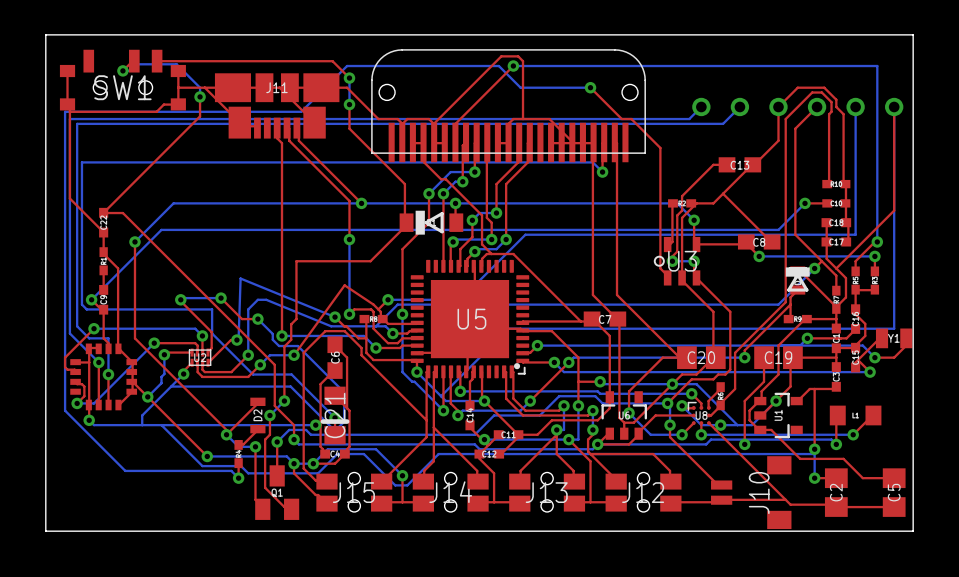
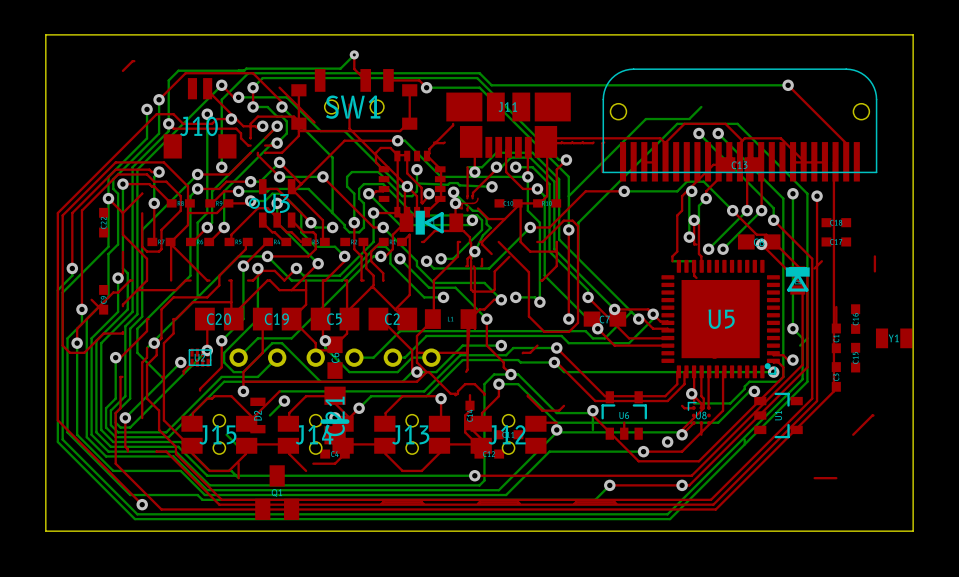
top track: none -> (354, 54) (354, 69) (365, 80)
bottom track: none -> (354, 54) (340, 68) (178, 70) (168, 80) (168, 131) (132, 167) (132, 311) (101, 343) (101, 429) (113, 442) (180, 442) (209, 470)
via: none -> (354, 54)
top track: (157, 61) (332, 61) (349, 78) -> none
top track: (513, 66) (455, 123) (455, 142) -> none
bottom track: (513, 66) (877, 66) (877, 241) -> none
via: (513, 66) -> none
bottom track: (122, 70) (129, 70) (136, 64) (176, 64) (200, 87) (200, 96) -> none
via: (122, 70) -> none
top track: (67, 71) (67, 104) (69, 104) (69, 198) (103, 232) (103, 254) (118, 268) (118, 348) (132, 362) (132, 381) -> none
top track: (178, 71) (178, 104) (163, 104) (156, 111) (69, 111) -> none
bottom track: (349, 78) (349, 104) -> none
via: (349, 78) -> none
SW1 position: (122, 80) -> (354, 99)
top track: none -> (388, 80) (419, 80) (426, 87)
top track: none -> (221, 85) (233, 97) (238, 97)
bottom track: none -> (221, 85) (137, 169) (137, 314) (125, 326) (125, 396) (110, 410) (110, 425) (118, 432) (166, 432) (221, 376) (257, 376) (277, 357)
via: none -> (221, 85)
top track: none -> (788, 85) (845, 143) (846, 161)
bottom track: none -> (788, 85) (491, 85) (479, 73) (248, 73) (221, 99) (221, 167)
via: none -> (788, 85)
top track: (178, 87) (347, 87) (378, 119) (397, 119) (402, 123) -> none
bottom track: none -> (253, 87) (262, 78) (477, 78) (559, 160) (566, 160)
via: none -> (253, 87)
bottom track: none -> (426, 87) (479, 87) (568, 176) (568, 229)
via: none -> (426, 87)
top track: (590, 87) (621, 119) (631, 119) (660, 147) (660, 268) (667, 277) -> none
bottom track: (590, 87) (520, 87) (498, 66) (347, 66) (301, 111) (65, 111) (65, 410) (125, 470) -> (77, 343) (77, 434) (113, 470) (125, 470)
via: (590, 87) -> none
top track: none -> (298, 90) (298, 121)
top track: none -> (409, 90) (409, 123) (400, 131) (298, 131)
top track: (200, 96) (200, 116) (103, 212) -> none
via: (200, 96) -> none
bottom track: none -> (238, 97) (286, 97) (320, 131) (344, 131) (400, 186) (407, 186)
via: none -> (238, 97)
top track: none -> (159, 99) (185, 73) (253, 73) (282, 102) (282, 106)
bottom track: none -> (159, 99) (159, 133) (113, 179) (113, 188) (118, 193) (118, 244) (108, 254) (108, 297) (86, 319) (86, 437) (106, 456) (173, 456) (207, 490) (498, 490) (556, 432) (679, 432)
via: none -> (159, 99)
via: (349, 104) -> none
J11 position: (277, 105) -> (508, 125)
part position: (508, 105) -> (739, 124)
bottom track: none -> (253, 106) (267, 106) (277, 116) (282, 116) (286, 121) (286, 133) (277, 143) (272, 143) (224, 191) (224, 227)
via: none -> (253, 106)
bottom track: none -> (282, 106) (332, 157) (332, 213)
via: none -> (282, 106)
part: (701, 106) -> none
bottom track: (739, 106) (723, 123) -> (72, 268) (72, 275) (57, 290) (57, 442) (134, 519) (670, 519) (807, 381) (807, 193) (737, 123) (723, 123)
part: (739, 106) -> none
part: (778, 106) -> none
top track: (817, 106) (795, 128) (795, 234) (836, 275) (836, 290) -> none
part: (817, 106) -> none
bottom track: (855, 106) (855, 234) (525, 234) (460, 299) (388, 299) -> none
part: (855, 106) -> none
top track: (894, 106) (894, 210) (836, 268) -> none
bottom track: (894, 106) (894, 328) (508, 328) (441, 396) -> none
part: (894, 106) -> none
bottom track: none -> (147, 109) (147, 138) (108, 176) (108, 246) (62, 292) (62, 439) (137, 514) (667, 514) (802, 379) (802, 338) (792, 328) (792, 193)
via: none -> (147, 109)
bottom track: none -> (207, 114) (207, 213) (197, 222) (197, 297)
via: none -> (207, 114)
top track: none -> (231, 119) (216, 119) (212, 123) (183, 123) (173, 114) (156, 114) (57, 213) (57, 420) (142, 504)
via: none -> (231, 119)
top track: (523, 119) (523, 61) (518, 56) (501, 56) (433, 123) -> none
bottom track: (645, 119) (69, 119) (69, 333) (98, 362) -> (645, 119) (568, 196)
top track: none -> (298, 121) (294, 116) (257, 116) (250, 123) (250, 137)
top track: none -> (168, 123) (173, 128) (236, 128) (241, 133) (241, 138) (250, 145)
via: none -> (168, 123)
top track: (402, 123) (407, 119) (429, 119) (433, 123) -> none
top track: none -> (453, 123) (429, 148) (429, 153) (426, 156) (441, 169) (441, 198) (426, 212)
bottom track: (677, 123) (77, 123) (77, 326) (89, 338) (108, 338) (108, 374) -> (677, 123) (578, 222) (578, 258)
via: none -> (262, 126)
top track: none -> (277, 126) (265, 138)
bottom track: none -> (277, 126) (212, 191) (212, 222) (207, 227)
via: none -> (277, 126)
top track: (277, 128) (277, 138) (282, 143) (282, 335) -> none
top track: (287, 128) (289, 128) (289, 140) (349, 200) (349, 239) -> none
bottom track: none -> (698, 133) (773, 208) (773, 220)
via: none -> (698, 133)
bottom track: none -> (718, 133) (783, 198) (783, 376) (778, 381) (749, 381) (730, 403) (694, 403)
via: none -> (718, 133)
top track: (298, 135) (298, 140) (361, 203) -> (298, 135) (282, 152) (265, 153)
top track: none -> (397, 140) (344, 140) (294, 191) (291, 186) (291, 188) (322, 220) (322, 241) (324, 241)
bottom track: none -> (397, 140) (404, 140) (441, 176) (527, 176) (527, 210) (539, 222) (539, 302) (535, 297) (515, 297)
via: none -> (397, 140)
top track: none -> (742, 140) (725, 123) (684, 123) (665, 143)
top track: (412, 142) (424, 143) (424, 162) (441, 179) (445, 179) (482, 215) (482, 241) -> none
top track: (466, 142) (462, 145) (462, 181) -> none
top track: (487, 142) (486, 217) (491, 222) (491, 239) -> none
top track: (497, 142) (508, 143) (508, 123) (513, 119) (549, 119) (572, 142) -> (729, 161) (739, 162) (739, 143) (744, 138) (780, 138) (803, 161)
top track: (519, 142) (518, 162) (496, 184) (496, 213) -> none
top track: (614, 142) (617, 143) (617, 294) (679, 357) -> none
top track: none -> (277, 143) (274, 145) (265, 145)
via: none -> (277, 143)
top track: (592, 143) (592, 294) (617, 319) (619, 319) (619, 417) (624, 422) (633, 422) (682, 374) (696, 374) (713, 357) (713, 311) (682, 280) (682, 217) (696, 203) -> none
top track: none -> (665, 143) (660, 138) (542, 138) (547, 143) (547, 196) (539, 203) (517, 203)
top track: none -> (508, 147) (506, 150) (506, 172) (523, 188) (537, 188)
top track: none -> (250, 152) (228, 174) (197, 174)
top track: none -> (257, 152) (257, 155) (279, 176)
top track: none -> (397, 155) (407, 156) (407, 173) (421, 187) (421, 202) (426, 198)
top track: none -> (397, 155) (397, 212) (373, 213)
top track: none -> (397, 155) (390, 147) (380, 147) (376, 152) (376, 162) (384, 169)
top track: none -> (566, 160) (556, 169) (556, 203)
via: none -> (566, 160)
top track: none -> (644, 161) (654, 161)
top track: none -> (718, 161) (718, 179) (706, 191) (706, 198)
top track: none -> (750, 161) (747, 164) (747, 210)
top track: none -> (761, 161) (761, 210)
top track: none -> (803, 161) (824, 161)
top track: none -> (803, 161) (792, 162)
top track: none -> (835, 161) (833, 162) (833, 391) (715, 509) (161, 509) (115, 463) (115, 413) (120, 408) (120, 376) (122, 376)
top track: none -> (279, 162) (301, 184)
bottom track: none -> (279, 162) (260, 181) (250, 181)
via: none -> (279, 162)
top track: (527, 162) (506, 184) (506, 239) -> (527, 162) (527, 176)
via: none -> (221, 167)
top track: none -> (467, 167) (467, 198)
bottom track: none -> (467, 167) (482, 167) (496, 152) (532, 152) (559, 179) (559, 239) (638, 319)
top track: none -> (496, 167) (472, 192) (472, 198)
bottom track: none -> (496, 167) (501, 167) (510, 157) (530, 157) (554, 181) (554, 249) (614, 309)
via: none -> (496, 167)
bottom track: none -> (515, 167) (532, 167) (549, 184) (549, 251) (588, 290) (588, 297)
via: none -> (515, 167)
bottom track: none -> (416, 169) (416, 191) (412, 196) (402, 196) (378, 172) (351, 172) (347, 176) (347, 186) (354, 193) (354, 222)
via: none -> (416, 169)
top track: none -> (159, 172) (151, 172) (149, 169) (115, 169) (72, 213) (72, 268)
bottom track: none -> (159, 172) (154, 176) (154, 203)
via: none -> (159, 172)
bottom track: (474, 172) (450, 172) (429, 193) -> none
bottom track: (602, 172) (592, 162) (81, 162) (81, 304) (86, 309) (212, 309) (212, 333) (253, 374) (291, 374) (335, 417) -> none
via: (602, 172) -> none
via: none -> (197, 174)
bottom track: none -> (279, 176) (322, 176)
via: none -> (279, 176)
top track: none -> (322, 176) (373, 227) (383, 227)
via: none -> (322, 176)
via: none -> (527, 176)
top track: none -> (250, 181) (226, 181) (219, 188) (197, 188)
via: none -> (250, 181)
bottom track: (462, 181) (455, 181) (443, 193) -> none
via: (462, 181) -> none
bottom track: none -> (416, 183) (448, 184) (457, 183) (459, 185) (492, 186)
top track: none -> (122, 184) (149, 184) (171, 203)
bottom track: none -> (122, 184) (122, 268) (127, 273) (127, 309) (96, 340) (96, 432) (110, 446) (178, 446) (207, 475) (474, 475)
via: none -> (122, 184)
top track: (827, 184) (829, 184) (829, 114) (831, 111) (831, 102) (821, 92) (812, 92) (785, 119) (785, 302) (735, 352) (735, 388) (720, 403) (720, 405) (711, 415) (708, 415) -> none
part position: (836, 184) -> (547, 203)
top track: none -> (262, 186) (265, 188) (277, 188) (310, 222)
top track: none -> (407, 186) (416, 196) (417, 212)
via: none -> (407, 186)
via: none -> (492, 186)
bottom track: none -> (197, 188) (190, 196) (190, 275) (137, 328) (137, 352) (163, 379)
via: none -> (197, 188)
bottom track: none -> (537, 188) (544, 196) (544, 275) (597, 328)
via: none -> (537, 188)
top track: none -> (384, 189) (383, 191) (368, 193)
top track: none -> (238, 191) (224, 191) (210, 203)
bottom track: none -> (238, 191) (308, 188) (349, 232) (359, 232) (363, 227) (363, 203) (359, 198) (359, 188) (363, 184) (383, 184) (414, 215) (477, 215) (482, 220) (482, 229) (453, 258) (441, 258)
via: none -> (238, 191)
top track: none -> (624, 191) (585, 191) (549, 227) (530, 227)
bottom track: none -> (624, 191) (677, 191) (686, 181) (703, 181) (732, 210)
via: none -> (624, 191)
bottom track: none -> (691, 191) (689, 193) (689, 237)
via: none -> (691, 191)
bottom track: none -> (453, 192) (472, 210) (479, 210) (486, 218) (486, 224) (490, 227) (482, 235) (471, 259)
via: none -> (453, 192)
top track: none -> (142, 193) (122, 213)
bottom track: none -> (368, 193) (400, 225) (472, 225)
top track: (429, 193) (429, 222) (402, 249) (402, 314) -> none
top track: (443, 193) (443, 266) -> none
via: (443, 193) -> none
top track: (723, 193) (772, 241) -> none
via: none -> (792, 193)
top track: none -> (817, 196) (817, 401) (713, 504) (219, 504) (166, 451) (156, 451)
via: none -> (817, 196)
top track: none -> (108, 198) (122, 213)
via: none -> (108, 198)
top track: none -> (477, 198) (474, 203) (462, 203) (462, 208) (452, 206)
bottom track: none -> (706, 198) (698, 205) (698, 225)
via: none -> (706, 198)
top track: none -> (250, 200) (248, 203) (226, 203) (216, 213) (188, 213)
bottom track: none -> (250, 200) (265, 200) (272, 193) (282, 193) (301, 213) (301, 232) (315, 246) (335, 246) (344, 256)
via: none -> (250, 200)
top track: none -> (154, 203) (154, 241) (152, 241)
via: none -> (154, 203)
bottom track: none -> (277, 203) (277, 222) (318, 263)
via: none -> (277, 203)
via position: (361, 203) -> (368, 193)
top track: (672, 203) (672, 241) (667, 244) -> none
part position: (682, 203) -> (354, 241)
top track: (691, 203) (713, 203) (778, 140) (778, 106) (797, 87) (824, 87) (836, 99) (836, 106) (843, 114) (843, 184) (845, 184) (845, 222) (848, 222) (848, 241) (846, 241) -> none
top track: (805, 203) (827, 203) -> none
bottom track: (805, 203) (778, 229) (161, 229) (91, 299) -> none
via: (805, 203) -> none
part position: (836, 203) -> (508, 203)
top track: none -> (468, 206) (467, 210)
top track: none -> (477, 208) (488, 219) (504, 219)
top track: none -> (732, 210) (756, 234) (766, 234) (807, 275) (807, 367) (689, 485) (609, 485)
via: none -> (732, 210)
bottom track: none -> (747, 210) (708, 249)
via: none -> (747, 210)
bottom track: none -> (761, 210) (723, 249)
via: none -> (761, 210)
top track: (103, 213) (122, 213) (274, 364) (274, 405) (294, 425) (294, 439) -> none
top track: none -> (122, 213) (122, 234) (147, 258) (147, 280) (122, 306)
top track: none -> (142, 213) (142, 246) (147, 251) (159, 251) (161, 249) (161, 229) (180, 210) (180, 196) (166, 181) (154, 181) (147, 174) (118, 174) (81, 210) (81, 309)
bottom track: none -> (373, 213) (373, 241) (339, 275) (303, 275) (296, 268)
via: none -> (373, 213)
bottom track: (496, 213) (479, 213) (472, 220) -> none
via: (496, 213) -> none
top track: none -> (262, 220) (265, 220) (265, 225) (272, 232) (286, 241)
top track: none -> (291, 220) (303, 232) (313, 232) (315, 234) (315, 249) (308, 256) (267, 256)
bottom track: (694, 220) (677, 203) (173, 203) (134, 241) -> none
top track: none -> (773, 220) (812, 258) (812, 398) (711, 499) (221, 499) (175, 454) (175, 446) (159, 429) (159, 410) (147, 398) (147, 364) (156, 355) (156, 343) (161, 338) (161, 309) (173, 297) (207, 297) (219, 285) (219, 275) (245, 249) (245, 241) (247, 241)
via: none -> (773, 220)
bottom track: none -> (310, 222) (315, 227) (332, 227)
via: none -> (310, 222)
top track: none -> (354, 222) (354, 249) (361, 256) (361, 280) (363, 280)
via: none -> (354, 222)
top track: none -> (404, 222) (392, 234) (392, 249) (385, 256) (380, 256)
top track: (826, 222) (826, 258) (845, 278) (845, 297) (836, 307) (802, 273) (797, 273) (797, 271) -> none
top track: (472, 225) (472, 237) (460, 249) (460, 266) (458, 266) -> none
top track: none -> (698, 225) (698, 254) (701, 256) (701, 266)
top track: (404, 226) (370, 261) (296, 261) (296, 319) (291, 324) (291, 339) (284, 346) (284, 401) -> none
top track: none -> (207, 227) (190, 241)
via: none -> (207, 227)
top track: none -> (224, 227) (209, 241)
via: none -> (224, 227)
via: none -> (332, 227)
bottom track: none -> (383, 227) (416, 261) (416, 266) (433, 282) (484, 282) (501, 299)
via: none -> (383, 227)
bottom track: none -> (530, 227) (489, 268) (433, 268) (426, 261)
via: none -> (530, 227)
top track: none -> (568, 229) (568, 319)
via: none -> (568, 229)
via: none -> (689, 237)
bottom track: (349, 239) (349, 314) -> none
via: (349, 239) -> none
bottom track: (491, 239) (455, 239) (453, 241) -> none
via: (491, 239) -> none
bottom track: (506, 239) (496, 249) (477, 249) (474, 251) -> none
via: (506, 239) -> none
top track: (134, 241) (134, 338) (228, 432) -> none
via: (134, 241) -> none
top track: none -> (171, 241) (171, 244) (209, 280)
top track: none -> (171, 241) (188, 225) (188, 186) (163, 162) (115, 162) (62, 215) (62, 345) (69, 352) (84, 352) (103, 333) (122, 333) (122, 331)
top track: none -> (229, 241) (231, 241) (231, 234) (257, 208) (267, 208) (277, 217) (277, 222) (286, 232) (291, 232) (301, 241) (306, 241)
top track: none -> (268, 241) (243, 266)
top track: none -> (363, 241) (363, 251) (366, 254) (366, 268) (373, 275) (373, 285) (347, 311) (349, 319) (347, 319)
top track: none -> (383, 241) (380, 241) (371, 251) (371, 261) (383, 273) (383, 280)
top track: none -> (401, 241) (409, 234) (409, 294) (395, 309)
top track: none -> (421, 241) (434, 230) (463, 230) (469, 237) (471, 243) (471, 289) (473, 291) (492, 291) (494, 289) (494, 271) (509, 256)
top track: (453, 241) (450, 244) (451, 266) -> none
via: (453, 241) -> none
top track: none -> (460, 241) (457, 241) (457, 256) (433, 280) (433, 319)
top track: none -> (479, 241) (482, 241) (520, 203) (520, 241) (530, 251) (556, 251)
top track: none -> (498, 241) (528, 272) (528, 316) (544, 331) (569, 331) (578, 322) (578, 226) (572, 220) (563, 220) (542, 241) (537, 241)
top track: none -> (556, 241) (556, 266) (540, 280)
top track: (877, 241) (874, 241) (855, 261) (855, 271) -> none
via: (877, 241) -> none
top track: (696, 244) (747, 244) (746, 241) (744, 241) (759, 256) -> none
top track: none -> (761, 244) (802, 285) (802, 364) (691, 475) (474, 475)
via: none -> (708, 249)
via: none -> (723, 249)
top track: none -> (122, 251) (122, 273) (118, 278)
via: none -> (267, 256)
top track: none -> (344, 256) (344, 261) (325, 280) (322, 280) (322, 338) (325, 340)
via: none -> (344, 256)
bottom track: none -> (380, 256) (373, 256) (291, 338) (257, 338) (238, 357)
via: none -> (380, 256)
bottom track: (759, 256) (874, 256) -> none
via position: (759, 256) -> (761, 244)
via: (874, 256) -> none
bottom track: none -> (400, 258) (429, 287) (455, 287) (486, 319)
via: none -> (400, 258)
via: none -> (441, 258)
top track: (482, 258) (486, 254) (513, 254) (580, 321) -> none
part rotation: 0° (103, 261) -> 90° clockwise (392, 241)
part position: (103, 261) -> (392, 241)
via: none -> (426, 261)
via: (672, 261) -> none
U3 position: (677, 261) -> (272, 203)
via: (694, 261) -> none
top track: none -> (318, 263) (291, 290)
via: none -> (318, 263)
bottom track: none -> (243, 266) (243, 319) (221, 340)
via: none -> (243, 266)
via: none -> (72, 268)
via: none -> (257, 268)
top track: none -> (296, 268) (284, 280) (274, 270) (262, 270) (253, 280) (248, 280)
via: none -> (296, 268)
bottom track: (814, 268) (778, 304) (397, 304) (376, 326) -> none
via: (814, 268) -> none
top track: (103, 270) (103, 289) -> (253, 87) (253, 106)
via: none -> (118, 278)
top track: (696, 278) (730, 311) (730, 369) (725, 374) (718, 374) (713, 379) (691, 379) (667, 403) -> none
top track: none -> (132, 280) (118, 292) (113, 292) (77, 328) (77, 343)
top track: none -> (190, 280) (185, 280) (175, 290) (137, 290)
top track: none -> (229, 280) (231, 280) (231, 319) (233, 319) (231, 316) (267, 280) (269, 280) (279, 290) (306, 290)
top track: none -> (306, 280) (306, 304) (291, 319) (315, 343) (315, 357)
top track: none -> (344, 280) (347, 280) (347, 333) (330, 350) (315, 350)
part rotation: 0° (855, 280) -> 90° clockwise (238, 241)
part position: (855, 280) -> (238, 241)
part rotation: 0° (874, 280) -> 90° clockwise (315, 241)
part position: (874, 280) -> (315, 241)
top track: none -> (371, 287) (373, 287) (404, 319) (407, 319)
top track: (855, 289) (855, 314) (865, 323) (865, 335) (855, 345) (855, 348) (836, 348) (836, 367) -> none
top track: (874, 289) (855, 290) -> none
top track: (797, 290) (790, 297) (790, 319) (788, 319) -> none
bottom track: none -> (443, 297) (424, 297) (390, 263) (390, 251) (385, 246) (376, 246) (342, 280) (291, 280) (267, 256) (238, 256) (147, 348)
via: none -> (443, 297)
via: none -> (515, 297)
top track: none -> (588, 297) (629, 338) (667, 338)
via: none -> (588, 297)
top track: (221, 298) (242, 319) (257, 319) -> none
bottom track: (221, 298) (182, 298) (180, 299) -> none
via: (221, 298) -> none
via position: (91, 299) -> (81, 309)
top track: (180, 299) (211, 332) (211, 348) (208, 352) -> none
via: (180, 299) -> none
top track: (388, 299) (378, 309) -> none
via: (388, 299) -> none
top track: none -> (501, 299) (494, 299) (484, 309) (479, 309) (468, 319)
via: none -> (501, 299)
part rotation: 0° (836, 299) -> 90° clockwise (161, 241)
part position: (836, 299) -> (161, 241)
via: none -> (539, 302)
top track: (790, 304) (744, 350) (744, 357) -> none
bottom track: none -> (81, 309) (81, 323) (67, 338) (67, 432) (130, 495) (197, 495) (202, 499) (595, 499) (609, 485)
top track: (103, 309) (103, 338) (108, 343) (108, 348) -> none
top track: none -> (614, 309) (648, 309) (660, 321) (667, 322)
via: none -> (614, 309)
bottom track: none -> (631, 311) (604, 338) (592, 338) (585, 331) (400, 331) (373, 357) (354, 357)
top track: (349, 314) (354, 309) (371, 309) (373, 311) (373, 328) (388, 343) (397, 343) (402, 338) (417, 338) -> none
via: (349, 314) -> none
bottom track: (402, 314) (402, 372) (443, 410) -> none
via: (402, 314) -> none
via: none -> (653, 314)
bottom track: none -> (657, 314) (629, 343) (568, 343) (561, 335) (426, 335) (404, 357) (392, 357)
top track: (335, 317) (358, 338) (366, 338) -> none
bottom track: (335, 317) (240, 278) (238, 338) -> (257, 268) (257, 319) (238, 338)
via: (335, 317) -> none
top track: none -> (148, 319) (147, 319) (147, 331) (120, 357) (115, 357)
top track: none -> (204, 319) (207, 319) (207, 350)
bottom track: (257, 319) (272, 333) (272, 339) (279, 346) (297, 346) (344, 392) (344, 421) (338, 427) (331, 427) (290, 386) (171, 386) -> none
via: (257, 319) -> none
top track: none -> (262, 319) (262, 352) (243, 372) (243, 391)
top track: (364, 319) (366, 319) (366, 352) (373, 360) (416, 360) (416, 372) -> none
part position: (373, 319) -> (180, 203)
top track: none -> (378, 319) (380, 319) (412, 350) (412, 372)
top track: none -> (433, 319) (416, 335) (416, 362) (426, 372)
top track: (469, 319) (469, 328) (551, 331) (578, 357) (578, 405) -> none
U5 position: (469, 319) -> (720, 319)
top track: none -> (486, 319) (486, 345) (503, 362) (503, 367) (510, 374)
via: none -> (486, 319)
via: none -> (568, 319)
top track: none -> (638, 319) (643, 319) (653, 328) (667, 328) (667, 330)
via: none -> (638, 319)
part position: (797, 319) -> (219, 203)
top track: (836, 319) (805, 319) (778, 345) (778, 374) (761, 391) (761, 401) (759, 401) -> (773, 360) (783, 367) (783, 376) (759, 401)
top track: (417, 322) (388, 323) (380, 319) (380, 311) (373, 304) (344, 285) (294, 355) -> none
top track: (522, 322) (523, 321) (595, 321) (592, 319) (609, 335) (609, 408) (597, 420) (551, 420) (537, 434) (518, 434) (482, 398) (481, 371) -> none
top track: (94, 328) (65, 357) (65, 367) (67, 369) (74, 369) (75, 371) -> none
bottom track: (94, 328) (195, 328) (202, 335) -> none
via: (94, 328) -> none
top track: none -> (597, 328) (614, 345) (667, 345)
via: none -> (597, 328)
via: none -> (792, 328)
top track: (855, 329) (846, 338) (807, 338) -> none
top track: (417, 330) (409, 331) (407, 333) (392, 333) -> none
bottom track: (392, 333) (385, 326) (331, 326) (266, 299) (257, 299) (248, 309) (248, 355) -> none
via: (392, 333) -> none
top track: (202, 335) (202, 352) -> none
via: (202, 335) -> none
bottom track: (282, 335) (363, 335) (376, 348) -> none
via: (282, 335) -> none
via: (807, 338) -> none
top track: (882, 338) (879, 338) (855, 362) (855, 367) -> none
top track: (906, 338) (906, 345) (894, 357) (874, 357) -> none
top track: none -> (221, 340) (221, 367) (200, 390)
via: none -> (221, 340)
top track: (236, 340) (230, 340) (210, 360) -> none
bottom track: none -> (236, 340) (224, 352) (224, 362) (233, 372) (243, 372) (272, 343) (282, 343) (320, 381)
via: (236, 340) -> none
bottom track: none -> (325, 340) (325, 348) (349, 372) (397, 372) (412, 357) (431, 357)
via: none -> (325, 340)
via: none -> (77, 343)
top track: (154, 343) (195, 343) (197, 345) (197, 352) -> none
bottom track: (154, 343) (94, 403) (77, 403) -> none
top track: (335, 344) (347, 357) (347, 408) -> none
top track: (416, 345) (376, 348) -> none
bottom track: none -> (501, 345) (462, 345) (436, 372) (412, 372) (402, 381) (224, 381) (168, 437) (115, 437) (106, 427) (106, 408) (115, 398) (115, 357)
via: none -> (501, 345)
bottom track: (537, 345) (862, 345) (874, 357) -> none
via: (537, 345) -> none
top track: (98, 348) (88, 348) (89, 420) -> none
top track: none -> (147, 348) (147, 357) (142, 362) (142, 418)
via: (376, 348) -> none
top track: none -> (556, 348) (604, 396) (665, 396) (677, 384) (677, 372) (678, 371)
bottom track: none -> (556, 348) (513, 348) (506, 355) (460, 355) (424, 391) (279, 391)
via: none -> (556, 348)
bottom track: none -> (207, 350) (183, 374)
via: none -> (207, 350)
top track: (192, 352) (166, 352) (164, 354) -> none
top track: none -> (773, 353) (773, 355) (783, 355) (788, 360) (792, 360)
bottom track: (164, 354) (164, 374) (161, 376) (161, 383) (147, 396) -> none
via: (164, 354) -> none
top track: (248, 355) (231, 372) (204, 372) (202, 369) (202, 362) -> none
via: (248, 355) -> none
bottom track: (294, 355) (269, 355) (260, 364) -> none
via: (294, 355) -> none
via: none -> (115, 357)
part: none -> (238, 357)
part: none -> (277, 357)
part: none -> (315, 357)
part: none -> (354, 357)
part: none -> (392, 357)
part: none -> (431, 357)
top track: (686, 357) (662, 357) (629, 391) (629, 413) -> none
C20 position: (701, 357) -> (219, 319)
bottom track: (744, 357) (573, 357) (568, 362) -> none
via: (744, 357) -> none
top track: (764, 357) (764, 381) (744, 401) (744, 444) -> none
C19 position: (778, 357) -> (277, 319)
top track: (836, 357) (790, 357) (790, 386) (760, 415) -> none
via: (874, 357) -> none
top track: (522, 360) (523, 362) (554, 362) -> none
via: none -> (792, 360)
top track: (858, 360) (870, 372) -> none
top track: (75, 362) (89, 362) -> none
top track: (98, 362) (98, 405) -> none
via: (98, 362) -> none
bottom track: none -> (180, 362) (125, 417)
via: none -> (180, 362)
top track: (197, 362) (197, 372) (202, 376) (248, 376) (260, 364) -> none
top track: none -> (556, 362) (595, 401) (667, 401) (684, 384) (684, 372) (686, 371)
bottom track: none -> (556, 362) (462, 360) (426, 396) (371, 396) (359, 408)
top track: (568, 362) (530, 401) -> none
via: (568, 362) -> none
via: (260, 364) -> none
top track: (335, 370) (320, 384) (320, 446) (322, 449) (322, 454) (325, 454) -> none
top track: (428, 371) (426, 372) (426, 437) (381, 481) -> none
top track: (435, 371) (433, 372) (433, 461) (424, 470) (423, 481) -> none
top track: (451, 371) (450, 403) (457, 410) (457, 415) -> none
top track: (458, 371) (460, 372) (460, 391) -> none
top track: (473, 371) (469, 381) (469, 395) -> none
top track: (504, 371) (506, 372) (506, 398) (523, 415) (588, 415) (592, 410) -> none
top track: (511, 371) (513, 372) (513, 398) (525, 410) (542, 410) -> (527, 395) (542, 410)
top track: none -> (701, 371) (701, 396) (703, 398) (703, 408) (679, 432)
top track: none -> (724, 371) (723, 410) (682, 451) (643, 451)
bottom track: (416, 372) (445, 401) (484, 401) -> none
top track: none -> (426, 372) (416, 381) (243, 381)
top track: none -> (426, 372) (429, 372) (450, 393) (457, 393) (465, 384) (474, 384) (484, 395)
top track: (443, 372) (443, 410) -> (171, 241) (171, 280)
top track: none -> (694, 372) (694, 403)
bottom track: (773, 372) (870, 372) -> none
via: none -> (773, 372)
via: (870, 372) -> none
top track: (108, 374) (108, 405) -> none
via: (108, 374) -> none
via: (183, 374) -> none
via: none -> (510, 374)
part position: (103, 376) -> (412, 184)
top track: none -> (161, 376) (163, 376)
top track: (75, 381) (84, 386) (84, 396) (77, 403) -> none
top track: (132, 381) (207, 456) -> none
top track: (132, 381) (132, 391) (118, 405) -> none
top track: (578, 381) (600, 381) -> none
bottom track: (600, 381) (602, 384) (696, 384) (737, 425) -> none
via: (600, 381) -> none
top track: none -> (498, 384) (498, 396) (482, 413) (481, 423)
bottom track: none -> (498, 384) (518, 384) (556, 422) (718, 422) (749, 391) (754, 391)
via: none -> (498, 384)
via: (672, 384) -> none
top track: (836, 386) (836, 388) (809, 388) (796, 401) -> none
top track: (720, 387) (708, 401) -> (709, 371) (708, 401)
top track: (814, 388) (814, 449) -> none
via: none -> (243, 391)
top track: none -> (279, 391) (248, 422) (246, 423) (253, 417) (231, 396) (214, 396) (212, 398) (207, 398) (192, 413) (192, 423)
bottom track: (460, 391) (691, 393) -> none
via: (460, 391) -> none
via: none -> (754, 391)
top track: (335, 395) (349, 410) (349, 446) -> (469, 405) (469, 410) (465, 415) (465, 432) (479, 446) (481, 445) (477, 444) (441, 444) (439, 445) (448, 444) (421, 470) (402, 470) (385, 454) (385, 446) (383, 444) (344, 444) (343, 445) (351, 444) (349, 446)
via: (147, 396) -> none
part rotation: 0° (720, 396) -> 90° clockwise (200, 241)
part position: (720, 396) -> (200, 241)
via: none -> (441, 398)
top track: (257, 401) (226, 434) -> none
via: (484, 401) -> none
bottom track: (530, 401) (520, 410) (462, 410) (457, 415) -> none
via: (530, 401) -> none
bottom track: (776, 401) (751, 425) (701, 425) (682, 405) -> none
via: (776, 401) -> none
via: (77, 403) -> none
via: (667, 403) -> none
bottom track: (563, 405) (563, 429) (556, 429) -> none
via: (563, 405) -> none
bottom track: (578, 405) (578, 439) (484, 439) -> none
via: (578, 405) -> none
via: (682, 405) -> none
top track: none -> (359, 408) (344, 422) (343, 423) (349, 417) (327, 396) (306, 396) (289, 413) (288, 423)
via: none -> (359, 408)
via: (443, 410) -> none
top track: (749, 410) (749, 420) (756, 427) (760, 429) (771, 429) (800, 458) (843, 458) (862, 478) (894, 478) -> (749, 410) (698, 461) (638, 461) (590, 413)
bottom track: (629, 413) (650, 434) (682, 434) -> none
via: (629, 413) -> none
bottom track: (142, 415) (142, 425) -> (142, 415) (130, 427) (120, 427) (115, 422) (115, 413) (130, 398) (130, 328) (142, 316) (142, 229) (197, 174)
top track: (269, 415) (269, 434) (265, 439) (265, 487) (284, 507) (291, 509) -> none
via: (269, 415) -> none
via: (457, 415) -> none
top track: (694, 415) (655, 415) (629, 444) (597, 444) (609, 433) -> none
top track: (837, 415) (836, 444) -> none
part position: (855, 415) -> (450, 319)
top track: none -> (125, 417) (125, 446) (127, 451)
via: none -> (125, 417)
bottom track: (89, 420) (94, 425) (315, 425) -> none
via: (89, 420) -> none
top track: (426, 420) (361, 355) (361, 348) (344, 331) (325, 331) (303, 352) (303, 468) -> (231, 302) (192, 302) (175, 319) (173, 319) (173, 333) (163, 343) (163, 420) (190, 446) (192, 445) (192, 454) (209, 470) (228, 470) (245, 454) (245, 446) (248, 444) (286, 444) (289, 446) (289, 454) (303, 468)
top track: none -> (556, 422) (535, 423)
top track: (708, 422) (790, 504) (894, 507) -> none
top track: none -> (384, 423) (385, 413) (402, 396) (438, 396) (441, 398) (441, 422) (439, 423)
bottom track: (161, 425) (202, 466) (241, 466) (248, 473) (318, 473) (337, 454) (363, 454) (395, 485) -> (118, 278) (118, 311) (91, 338) (91, 434) (108, 451) (175, 451) (209, 485) (395, 485)
via: (315, 425) -> none
top track: (670, 425) (670, 437) (715, 482) (720, 482) (721, 485) -> none
bottom track: (670, 425) (670, 403) (602, 403) (595, 396) (559, 396) (539, 415) (494, 415) (474, 434) (310, 434) (306, 429) (289, 429) (277, 442) -> none
via position: (670, 425) -> (667, 442)
via: (720, 425) -> none
top track: (433, 427) (477, 470) (478, 481) -> none
top track: (257, 429) (243, 444) (238, 444) -> none
top track: (556, 429) (556, 454) (573, 470) (574, 481) -> none
top track: (592, 429) (592, 434) (588, 439) (588, 451) (616, 481) -> none
via: (592, 429) -> none
via: (226, 434) -> none
top track: (498, 434) (479, 454) (479, 458) (494, 473) (494, 502) -> none
top track: (520, 434) (499, 454) -> none
top track: (556, 434) (520, 470) (519, 481) -> none
bottom track: (701, 434) (853, 434) -> none
via: (701, 434) -> none
via: (853, 434) -> none
bottom track: (294, 439) (298, 444) (474, 444) (479, 449) (592, 449) (597, 444) (706, 444) (711, 439) (831, 439) (836, 444) -> none
via: (294, 439) -> none
via: (484, 439) -> none
top track: (568, 439) (590, 461) (590, 502) -> none
via: (568, 439) -> none
top track: (277, 442) (277, 475) -> none
via: (277, 442) -> none
via: (597, 444) -> none
via: (744, 444) -> none
via: (836, 444) -> none
top track: (255, 446) (255, 499) (262, 509) -> none
via: (255, 446) -> none
bottom track: (814, 449) (814, 478) -> none
via: (814, 449) -> none
via: none -> (643, 451)
part rotation: 0° (238, 454) -> 90° clockwise (277, 241)
part position: (238, 454) -> (277, 241)
top track: (590, 454) (653, 454) (670, 470) (670, 481) -> none
bottom track: (814, 454) (438, 454) (407, 485) -> (590, 413) (556, 413) (518, 374) (494, 374) (484, 384) (484, 480) (479, 485) (407, 485)
bottom track: (207, 456) (286, 456) (294, 463) (313, 463) (327, 449) (376, 449) (402, 475) -> none
via: (207, 456) -> none
top track: (294, 463) (294, 473) (326, 503) -> none
via: (294, 463) -> none
via: (313, 463) -> none
bottom track: (180, 470) (209, 470) -> (180, 470) (204, 495) (506, 495) (549, 451) (643, 451)
top track: (306, 470) (315, 480) (326, 481) -> none
top track: (402, 475) (402, 502) -> none
via: (402, 475) -> none
via: none -> (474, 475)
via: (238, 478) -> none
via: (814, 478) -> none
via: none -> (609, 485)
via: none -> (682, 485)
J15 position: (354, 492) -> (219, 434)
J14 position: (450, 492) -> (315, 434)
J13 position: (547, 492) -> (412, 434)
J12 position: (643, 492) -> (508, 434)
J10 rotation: 0° (751, 492) -> 90° clockwise (200, 118)
J10 position: (751, 492) -> (200, 118)
C2 rotation: 0° (836, 492) -> 90° clockwise (392, 319)
C2 position: (836, 492) -> (392, 319)
C5 rotation: 0° (894, 492) -> 90° clockwise (335, 319)
C5 position: (894, 492) -> (335, 319)
top track: (785, 499) (723, 499) (720, 502) (670, 503) -> none
via: none -> (142, 504)

